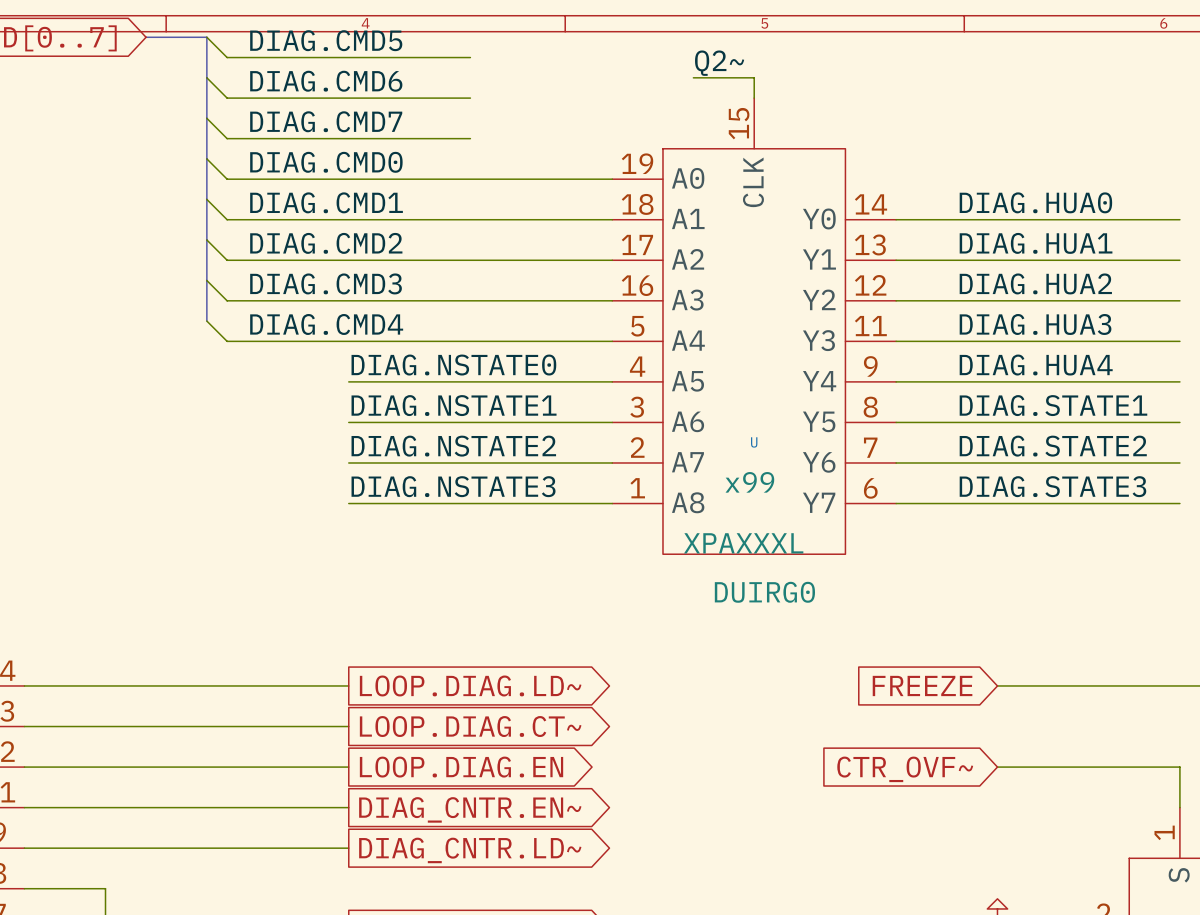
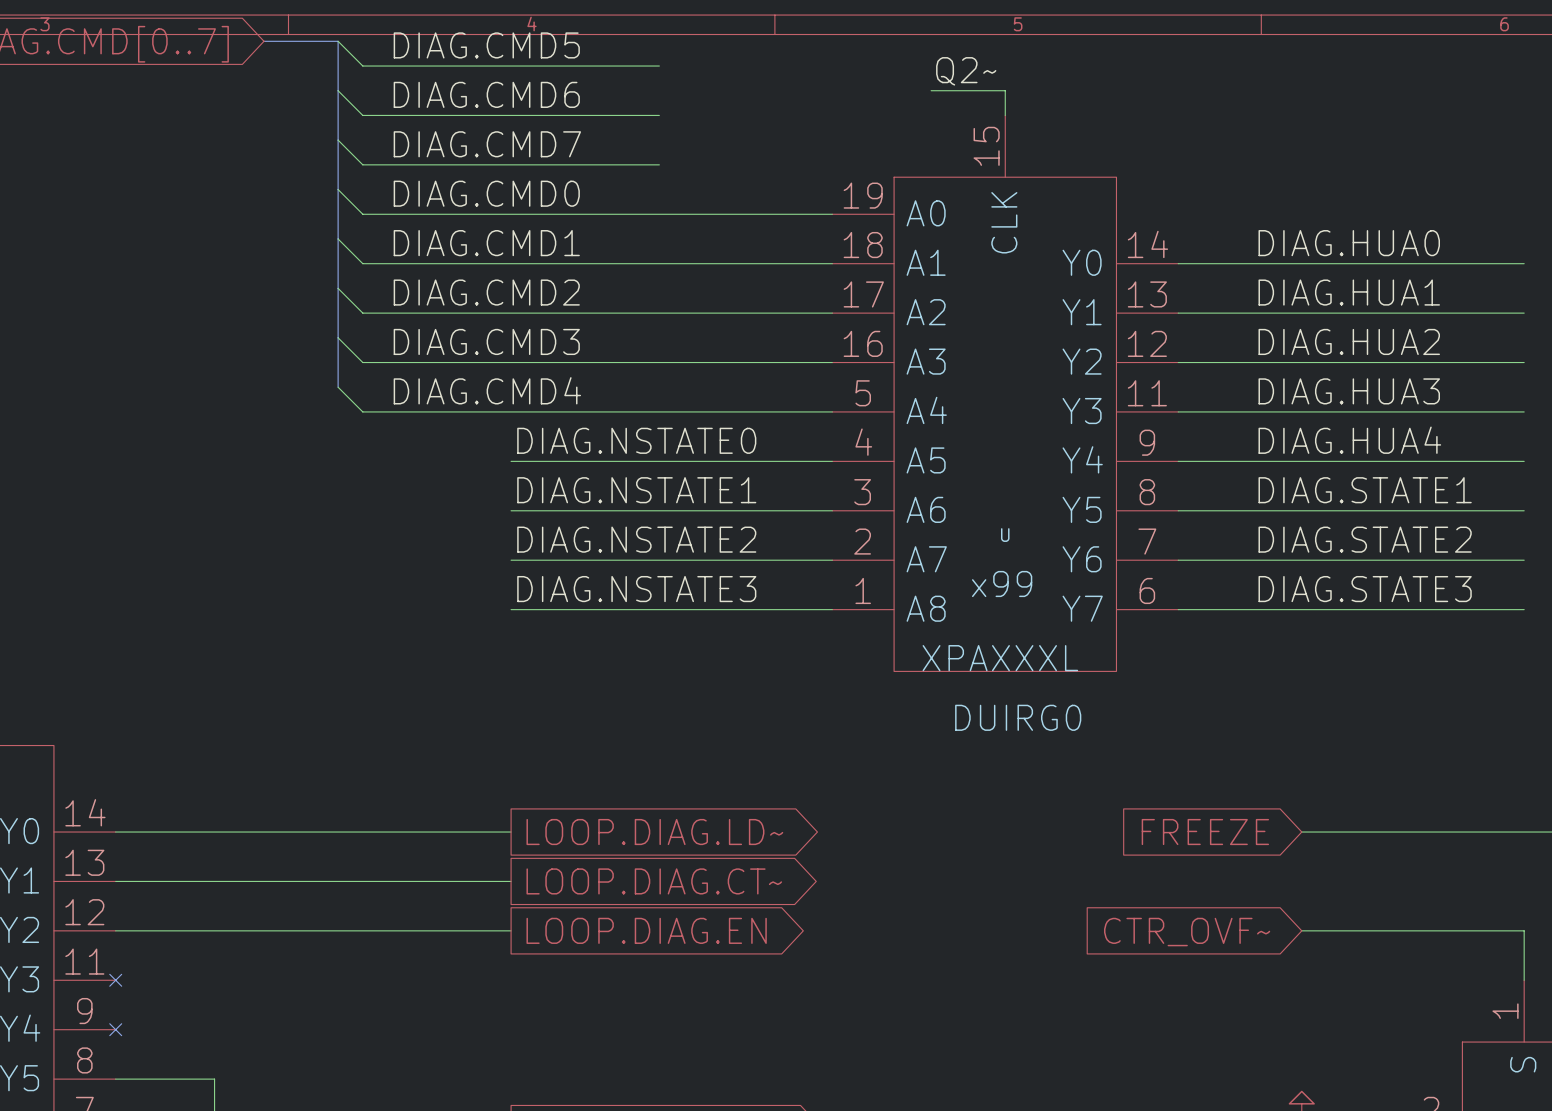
wire: (24, 807) (348, 807) -> none
no-connect mark: none -> (115, 980)
global label: DIAG_CNTR.EN~ (470, 809) -> none
wire: (24, 848) (348, 848) -> none
no-connect mark: none -> (115, 1029)
global label: DIAG_CNTR.LD~ (470, 850) -> none

